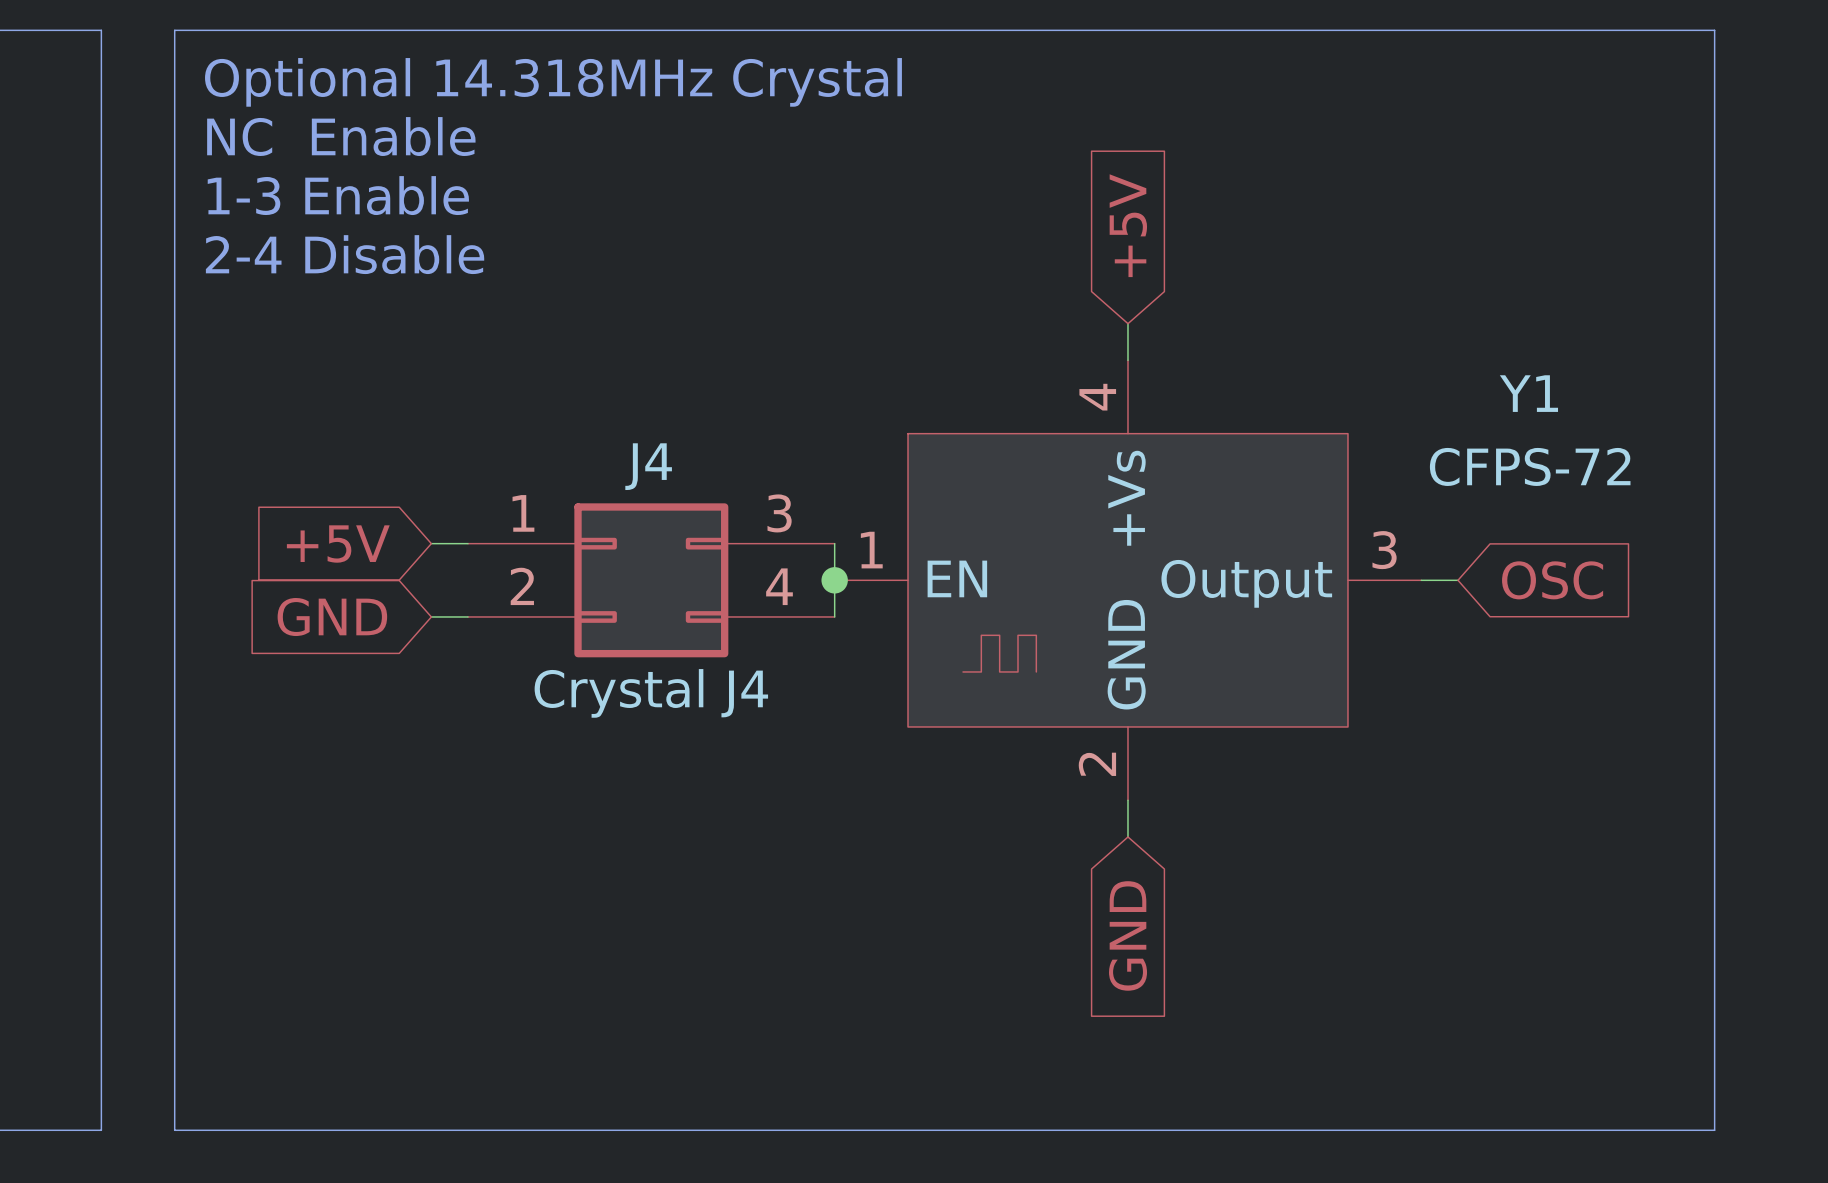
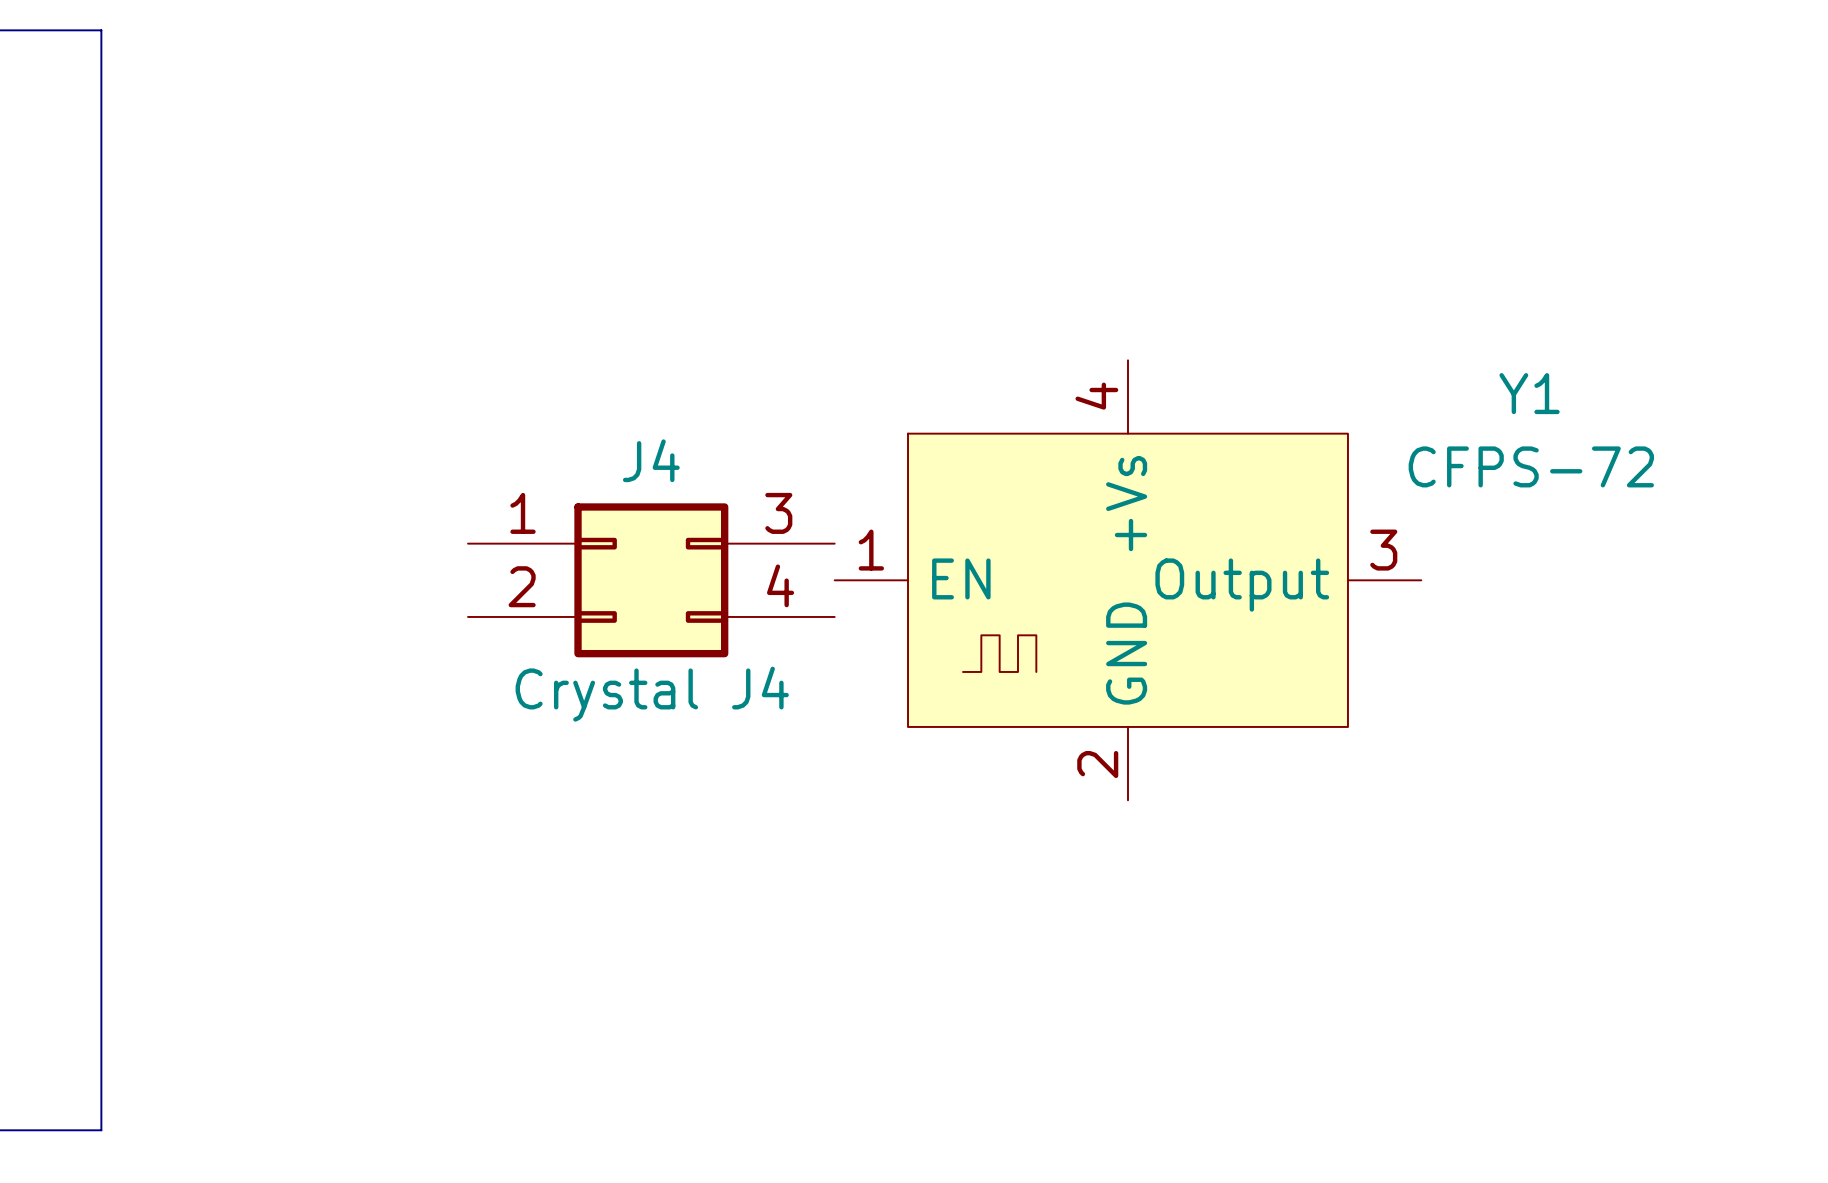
line: (174, 30) (1714, 30) (1714, 1130) (174, 1130) (174, 30) -> none
text: Optional 14.318MHz Crystal (553, 82) -> none
text: NC Enable (341, 136) -> none
text: 1-3 Enable (338, 195) -> none
global label: +5V (1128, 225) -> none
text: 2-4 Disable (345, 254) -> none
wire: (1127, 323) (1127, 360) -> none
wire: (431, 543) (468, 543) -> none
wire: (834, 543) (834, 616) -> none
global label: +5V (338, 544) -> none
junction: (834, 580) -> none
wire: (1421, 580) (1457, 580) -> none
global label: OSC (1552, 580) -> none
wire: (431, 616) (468, 616) -> none
global label: GND (332, 617) -> none
wire: (1127, 800) (1127, 836) -> none
global label: GND (1128, 935) -> none

